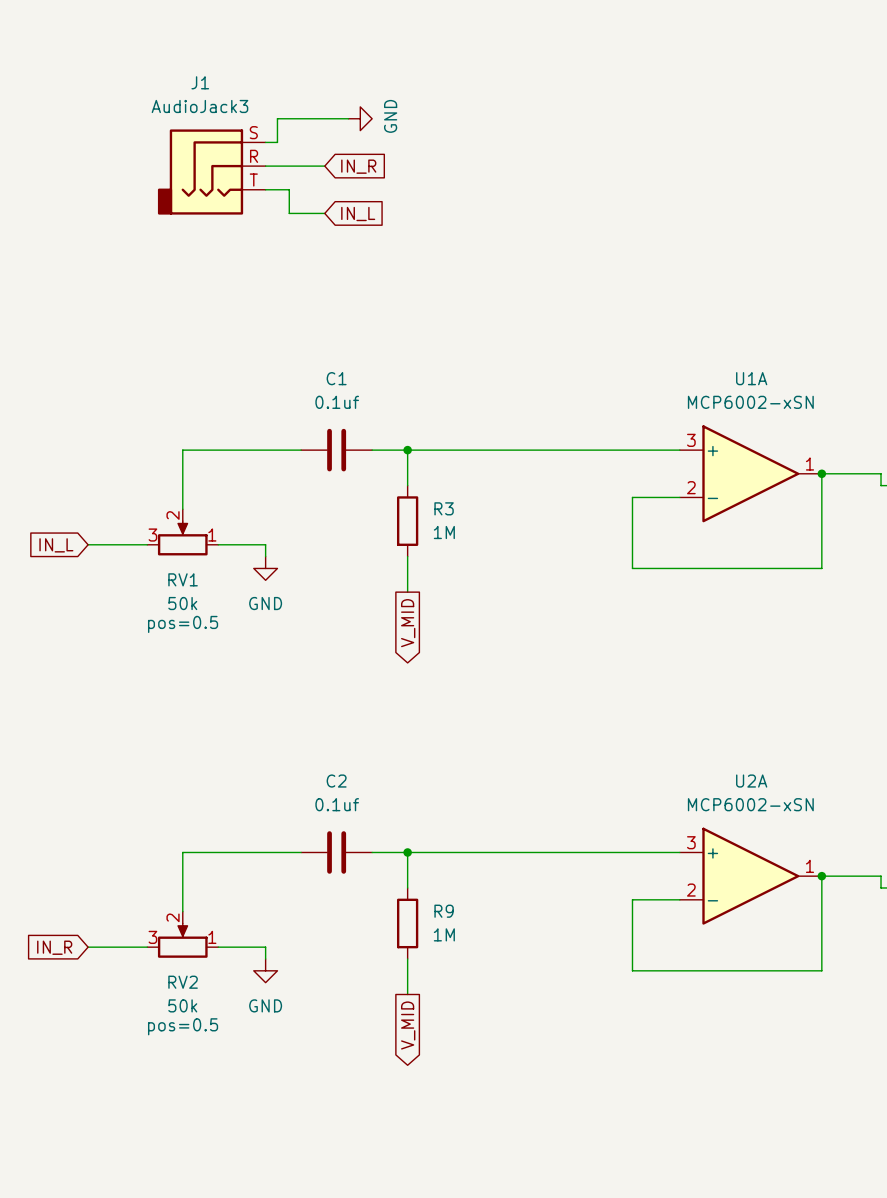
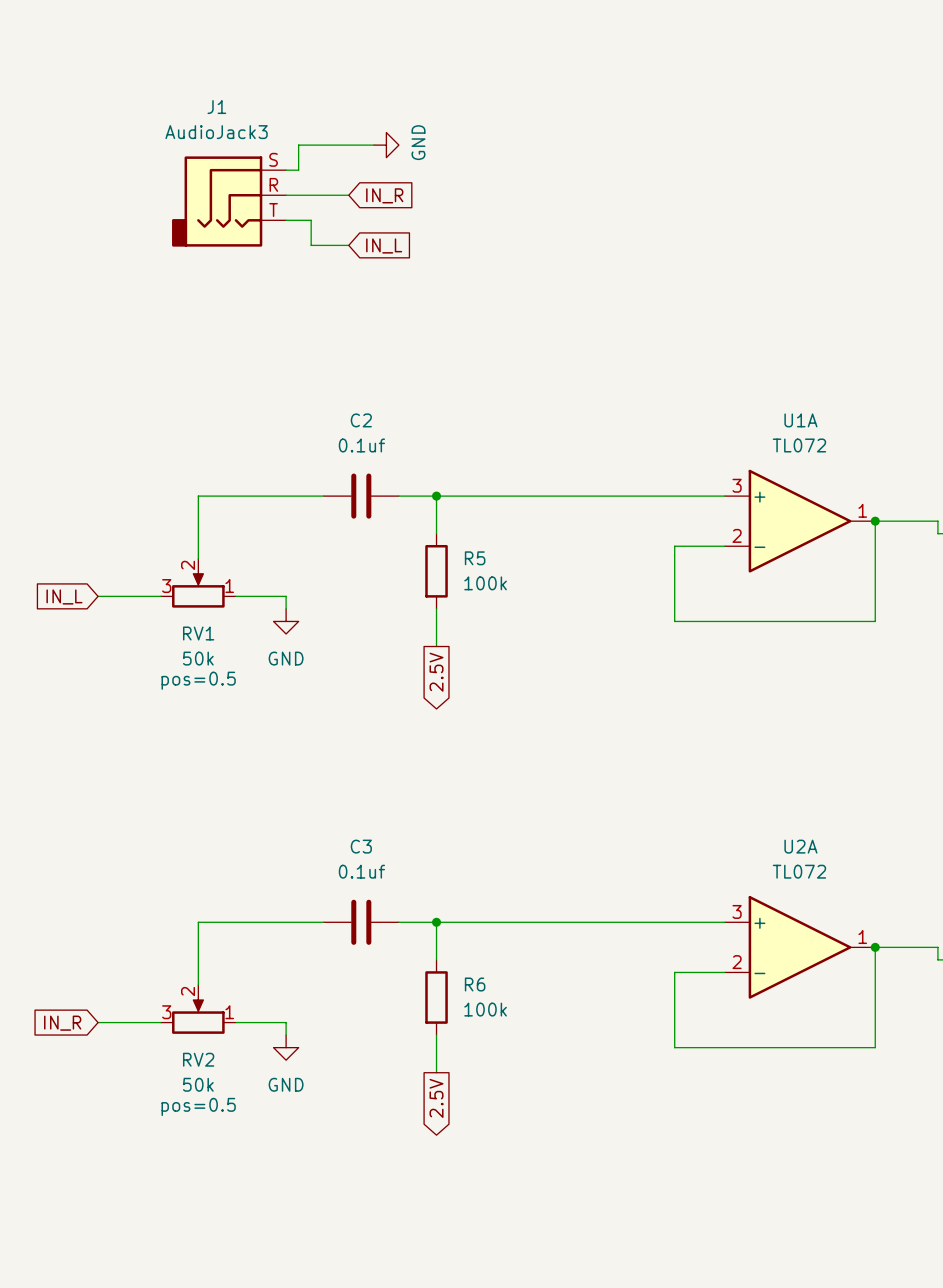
C1 name: C1 (336, 378) -> C2 (361, 420)
U1A value: MCP6002-xSN (750, 402) -> TL072 (799, 445)
R3 name: R3 (444, 508) -> R5 (475, 558)
R3 value: 1M (444, 532) -> 100k (485, 583)
global label: V_MID (408, 623) -> 2.5V (436, 672)
C2 name: C2 (336, 781) -> C3 (361, 846)
U2A value: MCP6002-xSN (750, 804) -> TL072 (799, 871)
R9 name: R9 (444, 911) -> R6 (475, 984)
R9 value: 1M (444, 934) -> 100k (485, 1009)
global label: V_MID (408, 1025) -> 2.5V (436, 1098)

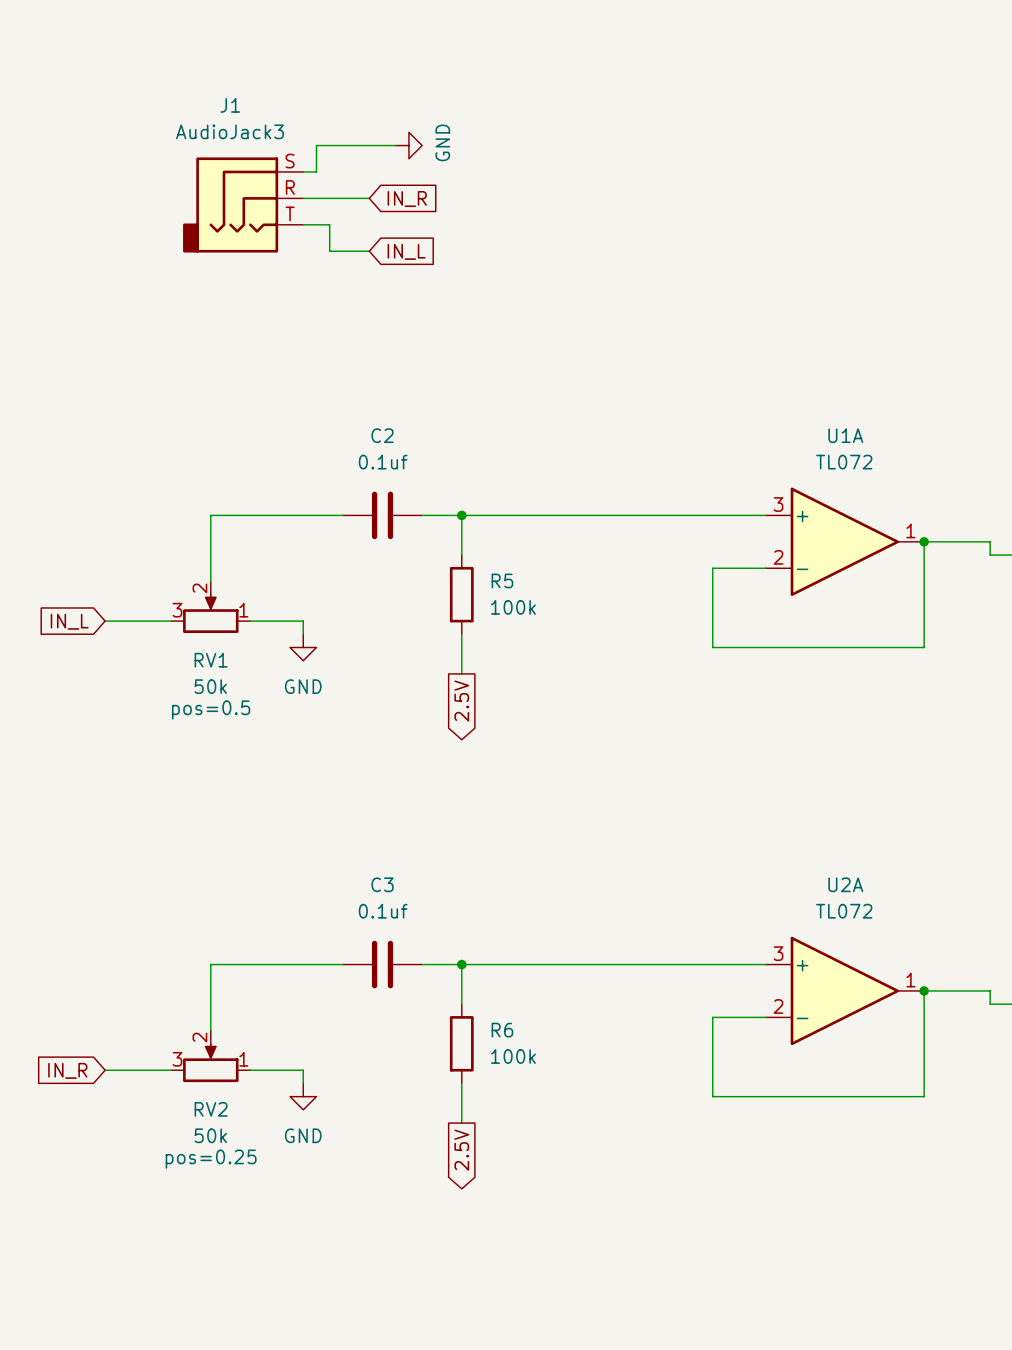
RV2 text: pos=0.5 (198, 1106) -> pos=0.25 (211, 1159)

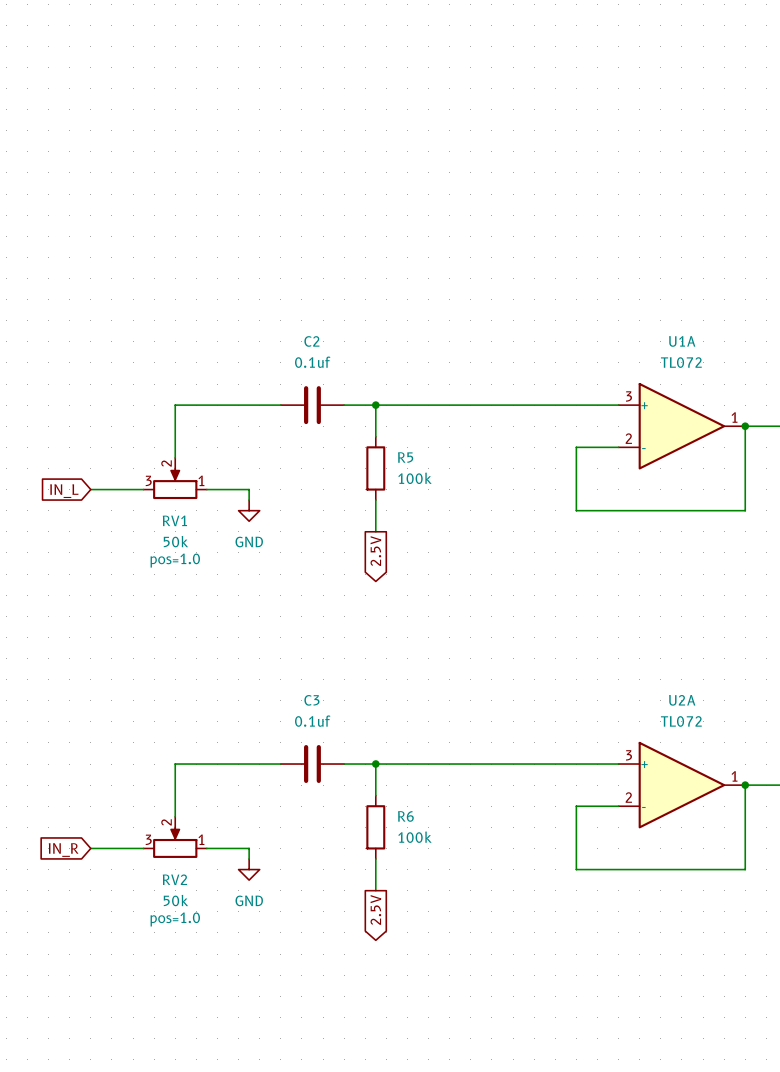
wire: (395, 145) (316, 145) (316, 171) (303, 171) -> none
power symbol: GND (408, 145) -> none
wire: (303, 198) (369, 198) -> none
global label: IN_R (407, 199) -> none
J1: AudioJack3 (243, 204) -> none
wire: (303, 224) (329, 224) (329, 251) (369, 251) -> none
global label: IN_L (406, 251) -> none
RV1 text: pos=0.5 (211, 709) -> pos=1.0 (175, 560)
RV2 text: pos=0.25 (211, 1159) -> pos=1.0 (175, 919)

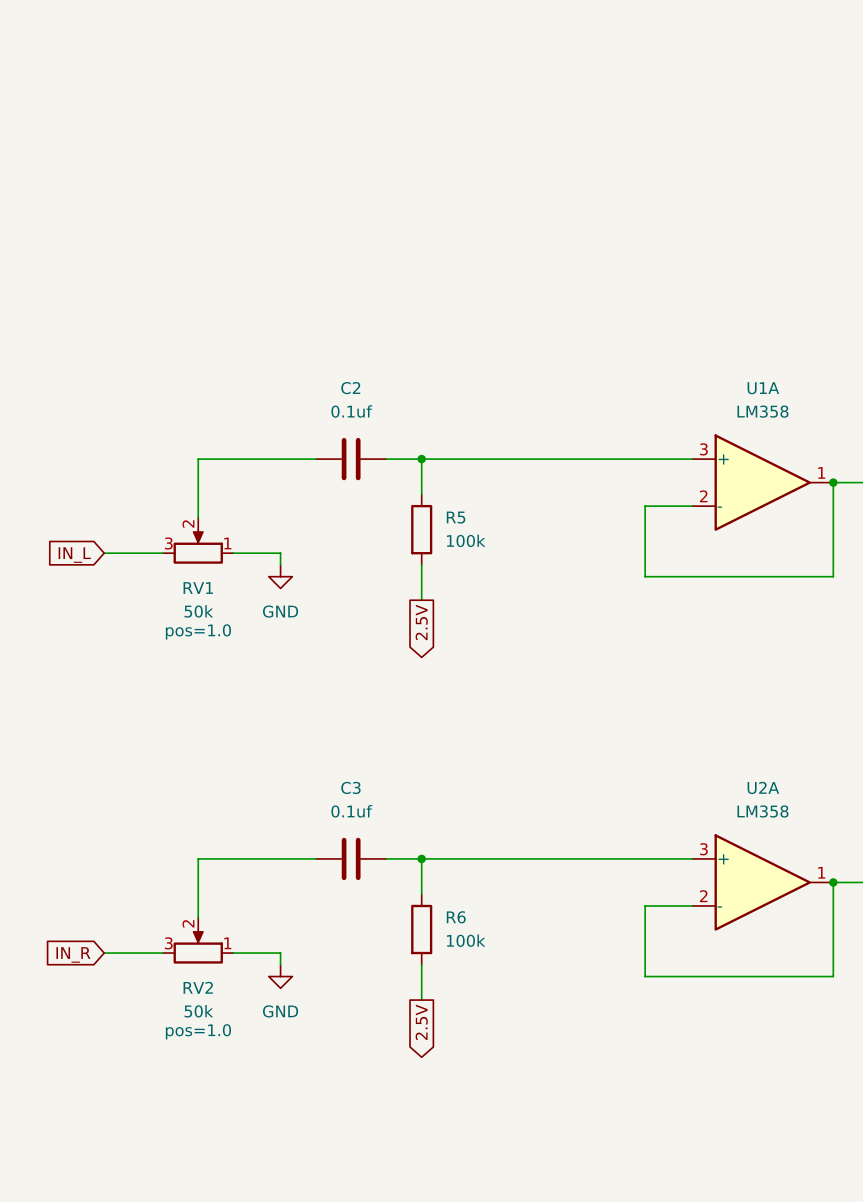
U1A value: TL072 (681, 362) -> LM358 (762, 411)
U2A value: TL072 (681, 721) -> LM358 (762, 811)

